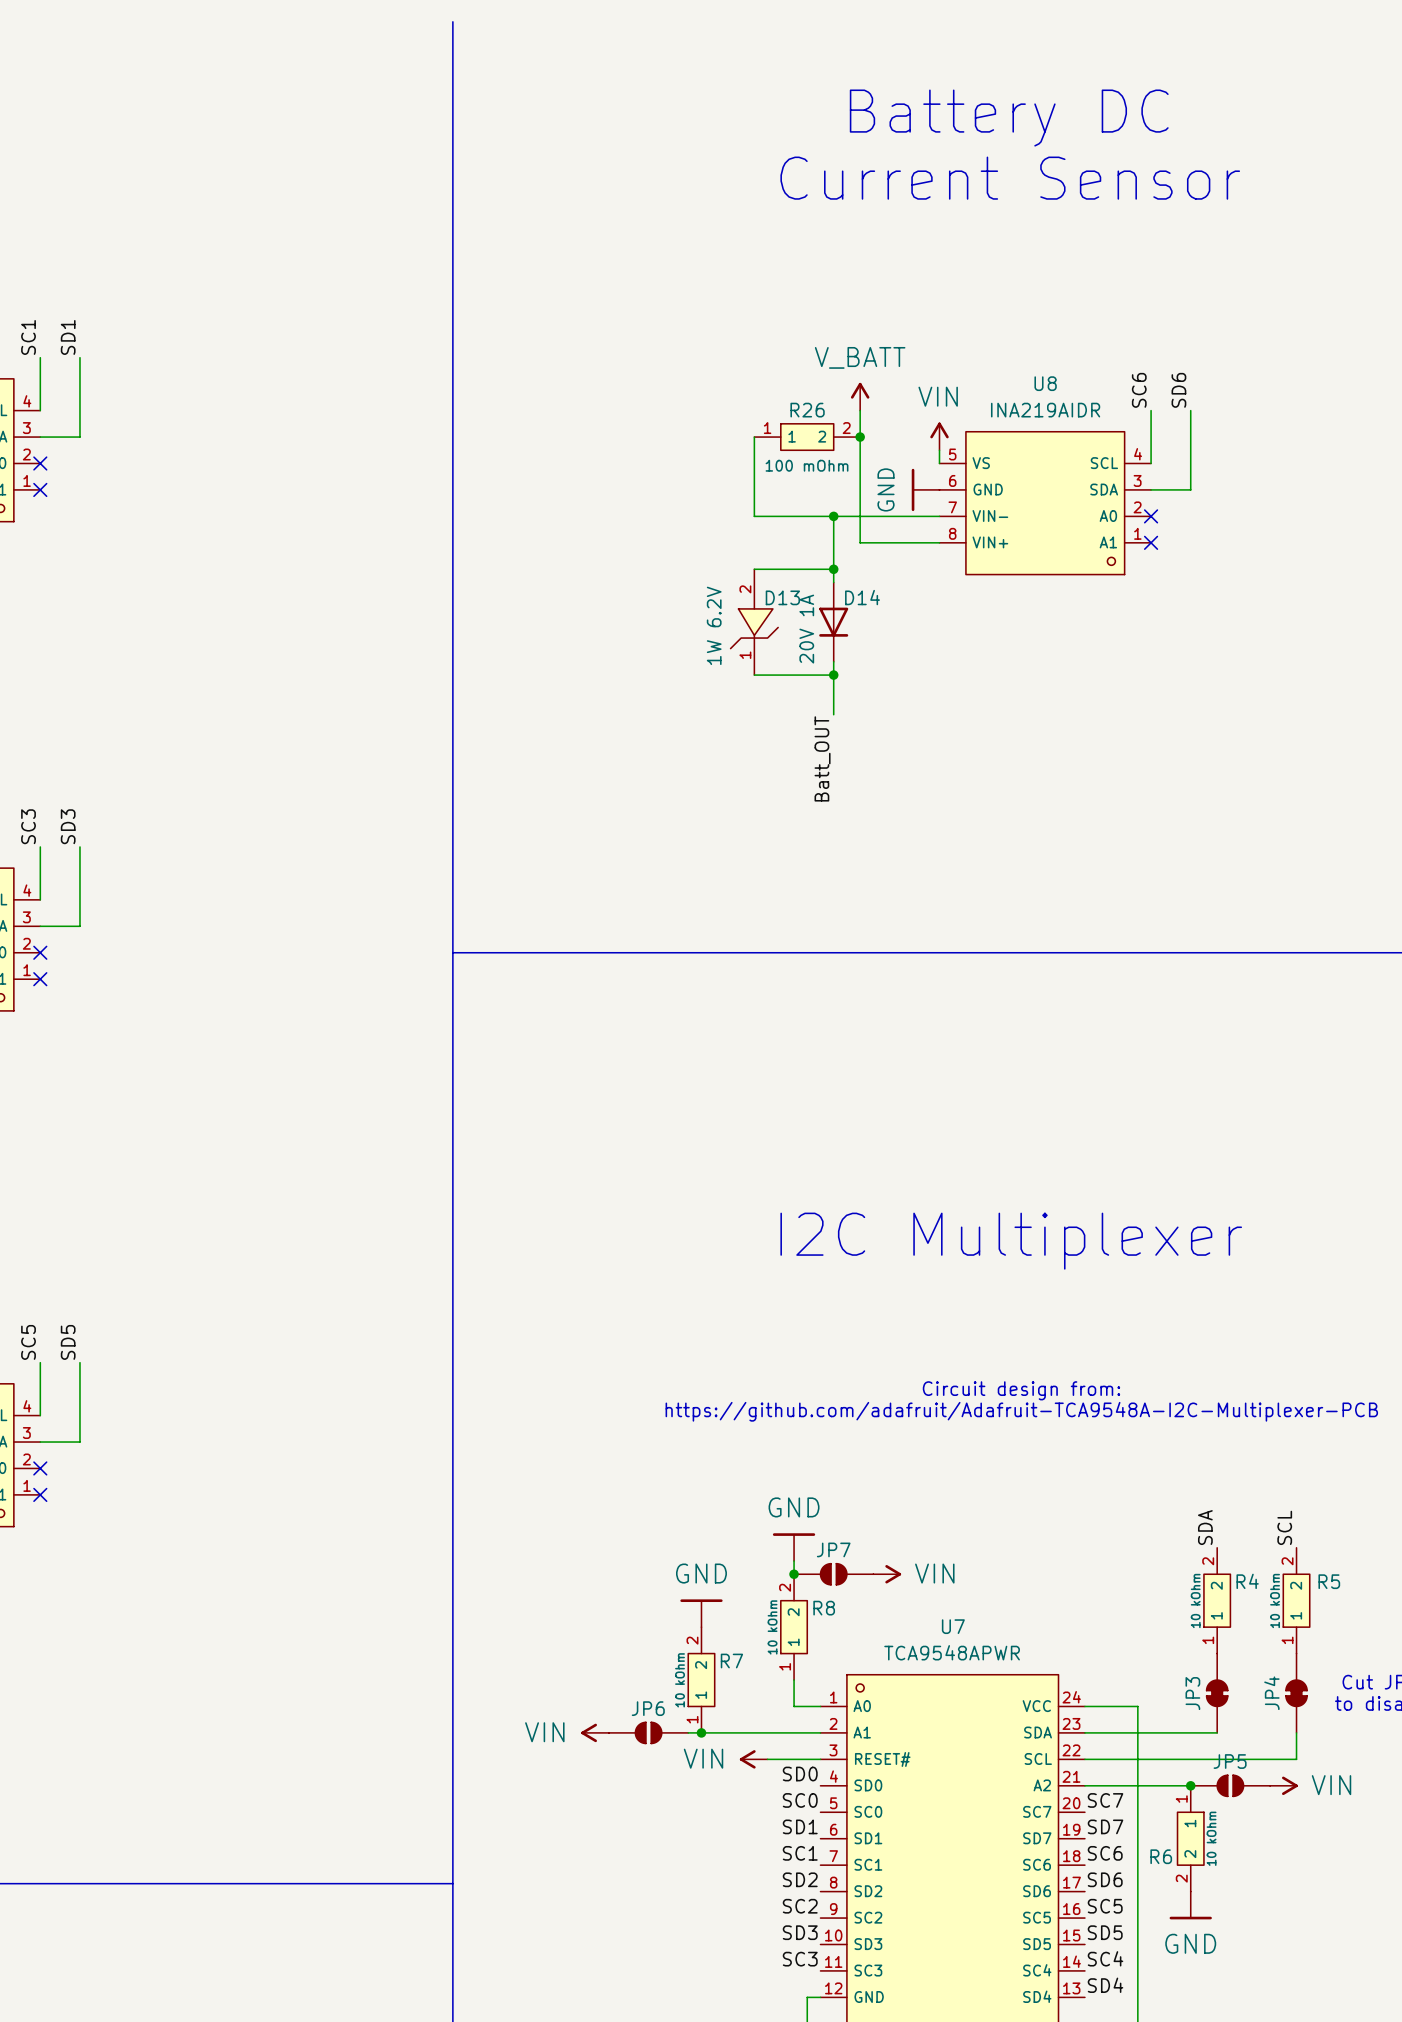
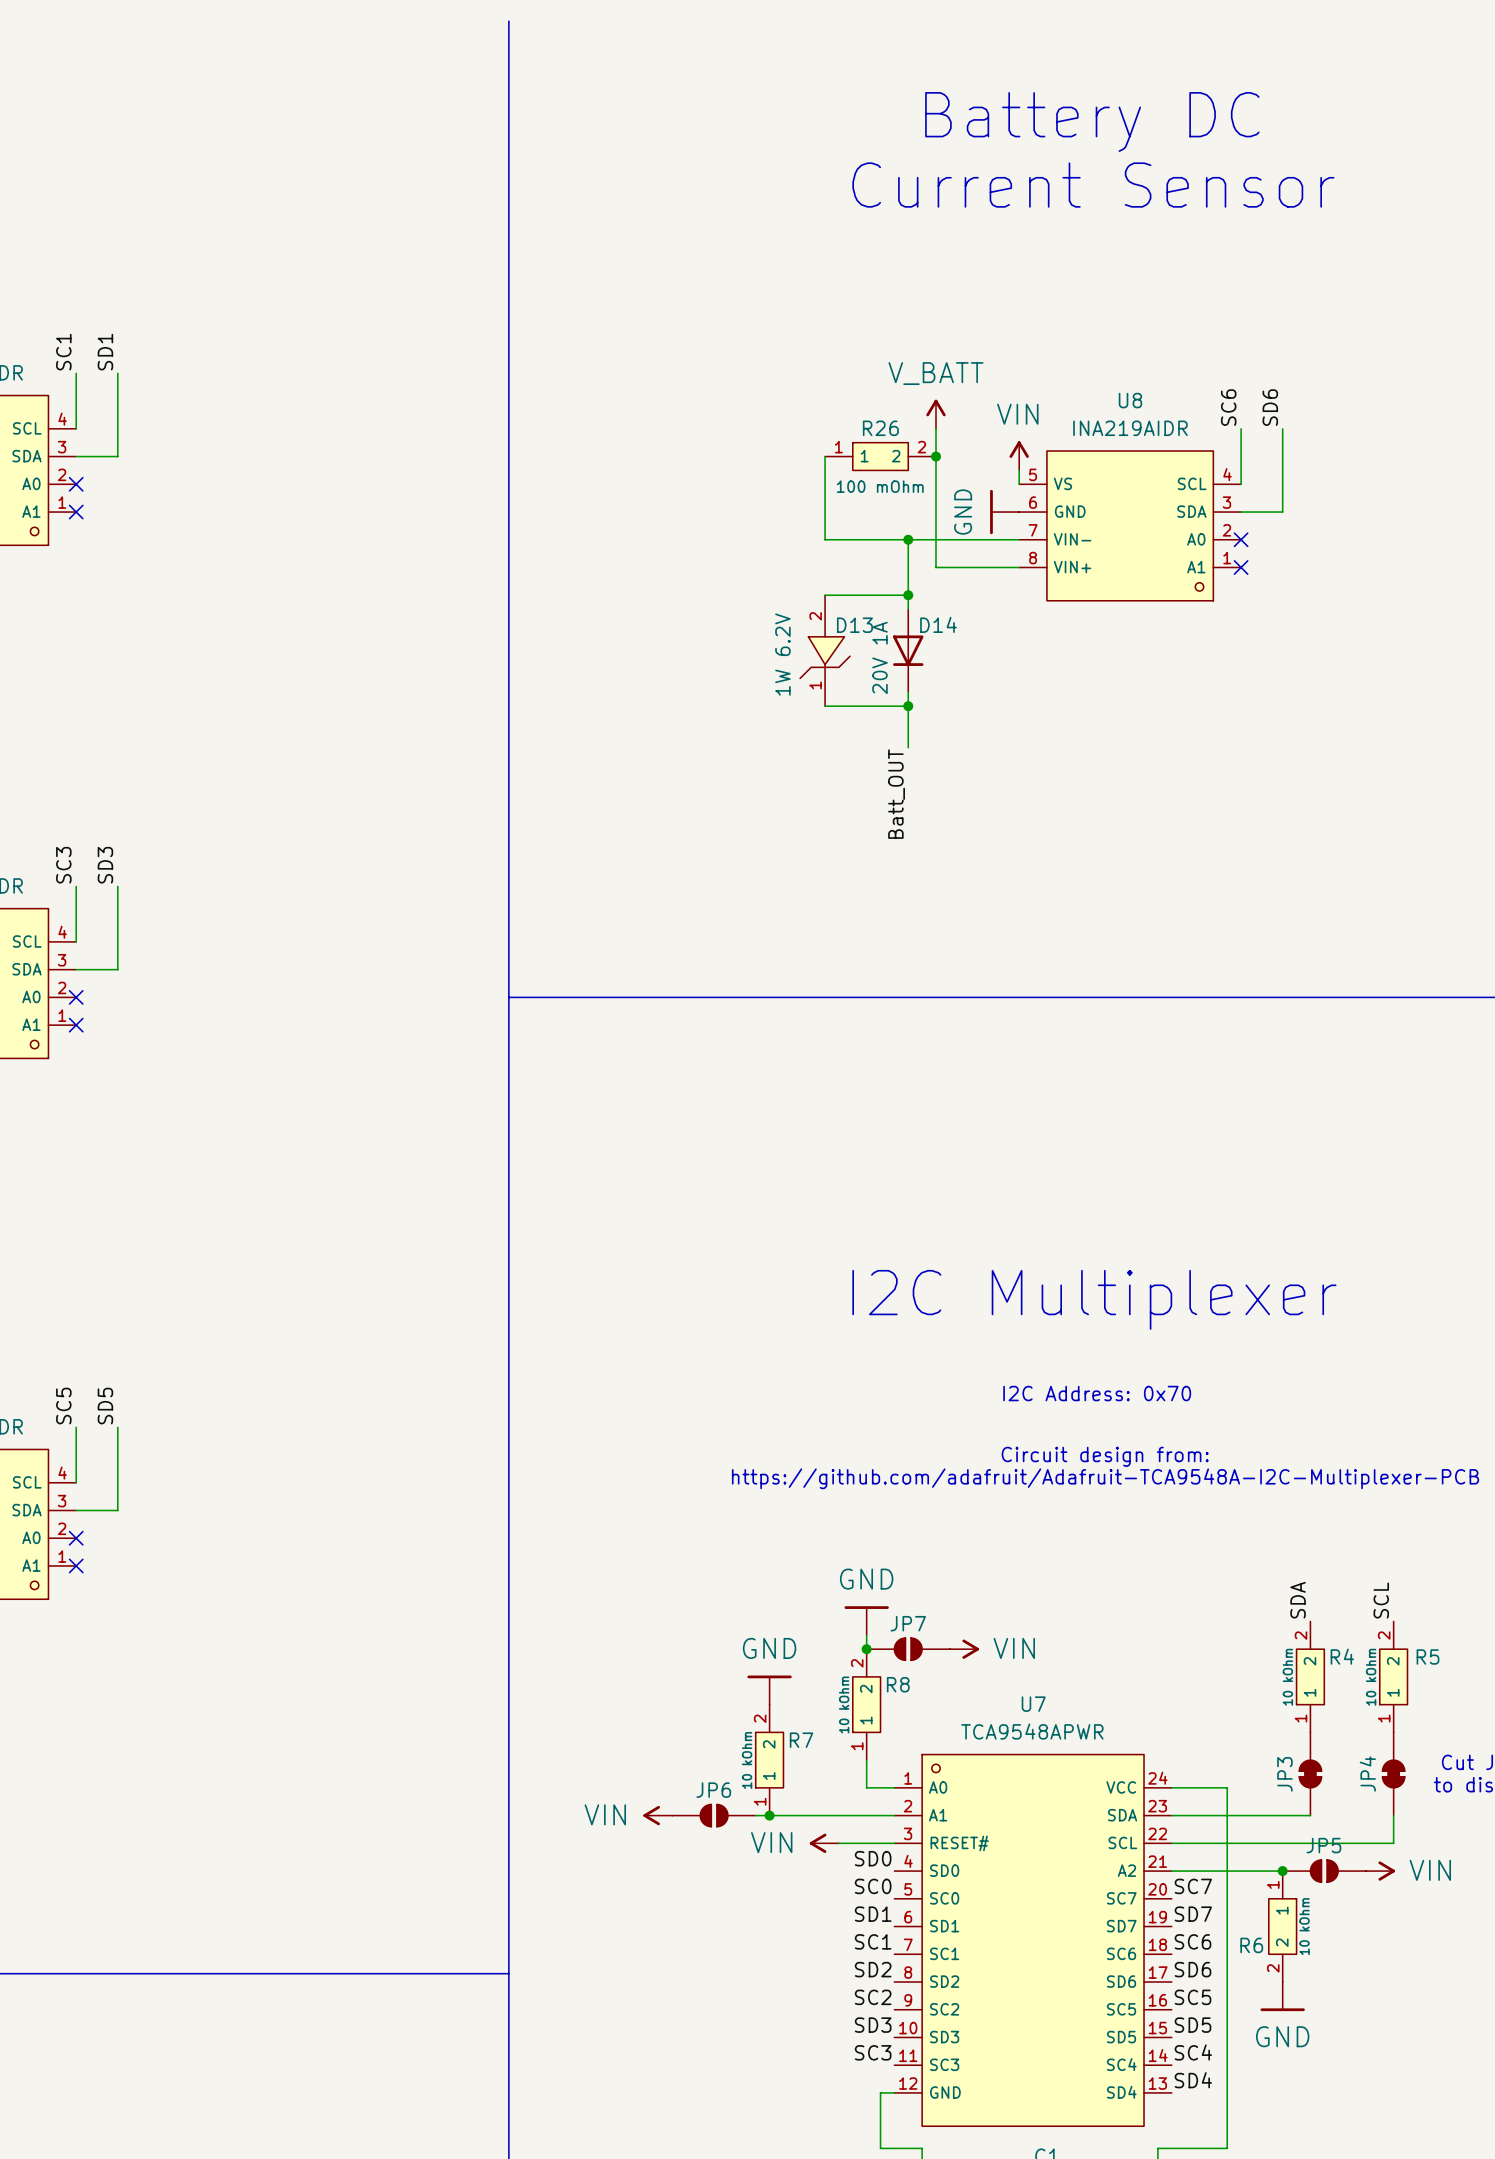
text: none -> I2C Address: 0x70 (1097, 1393)

